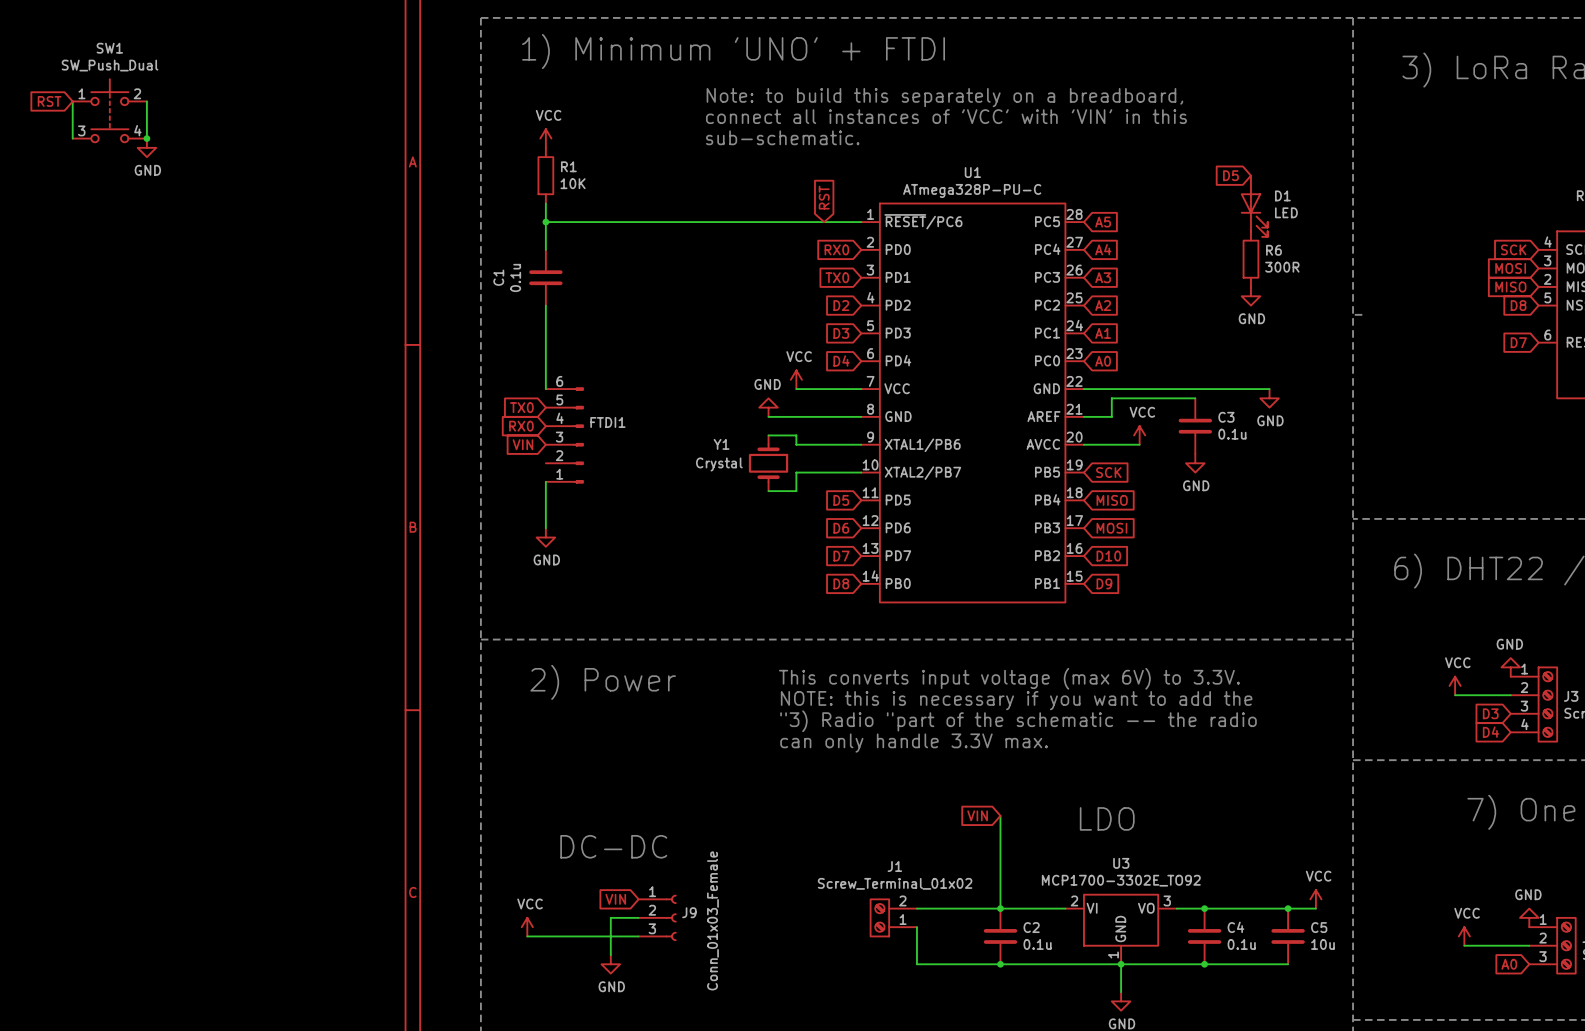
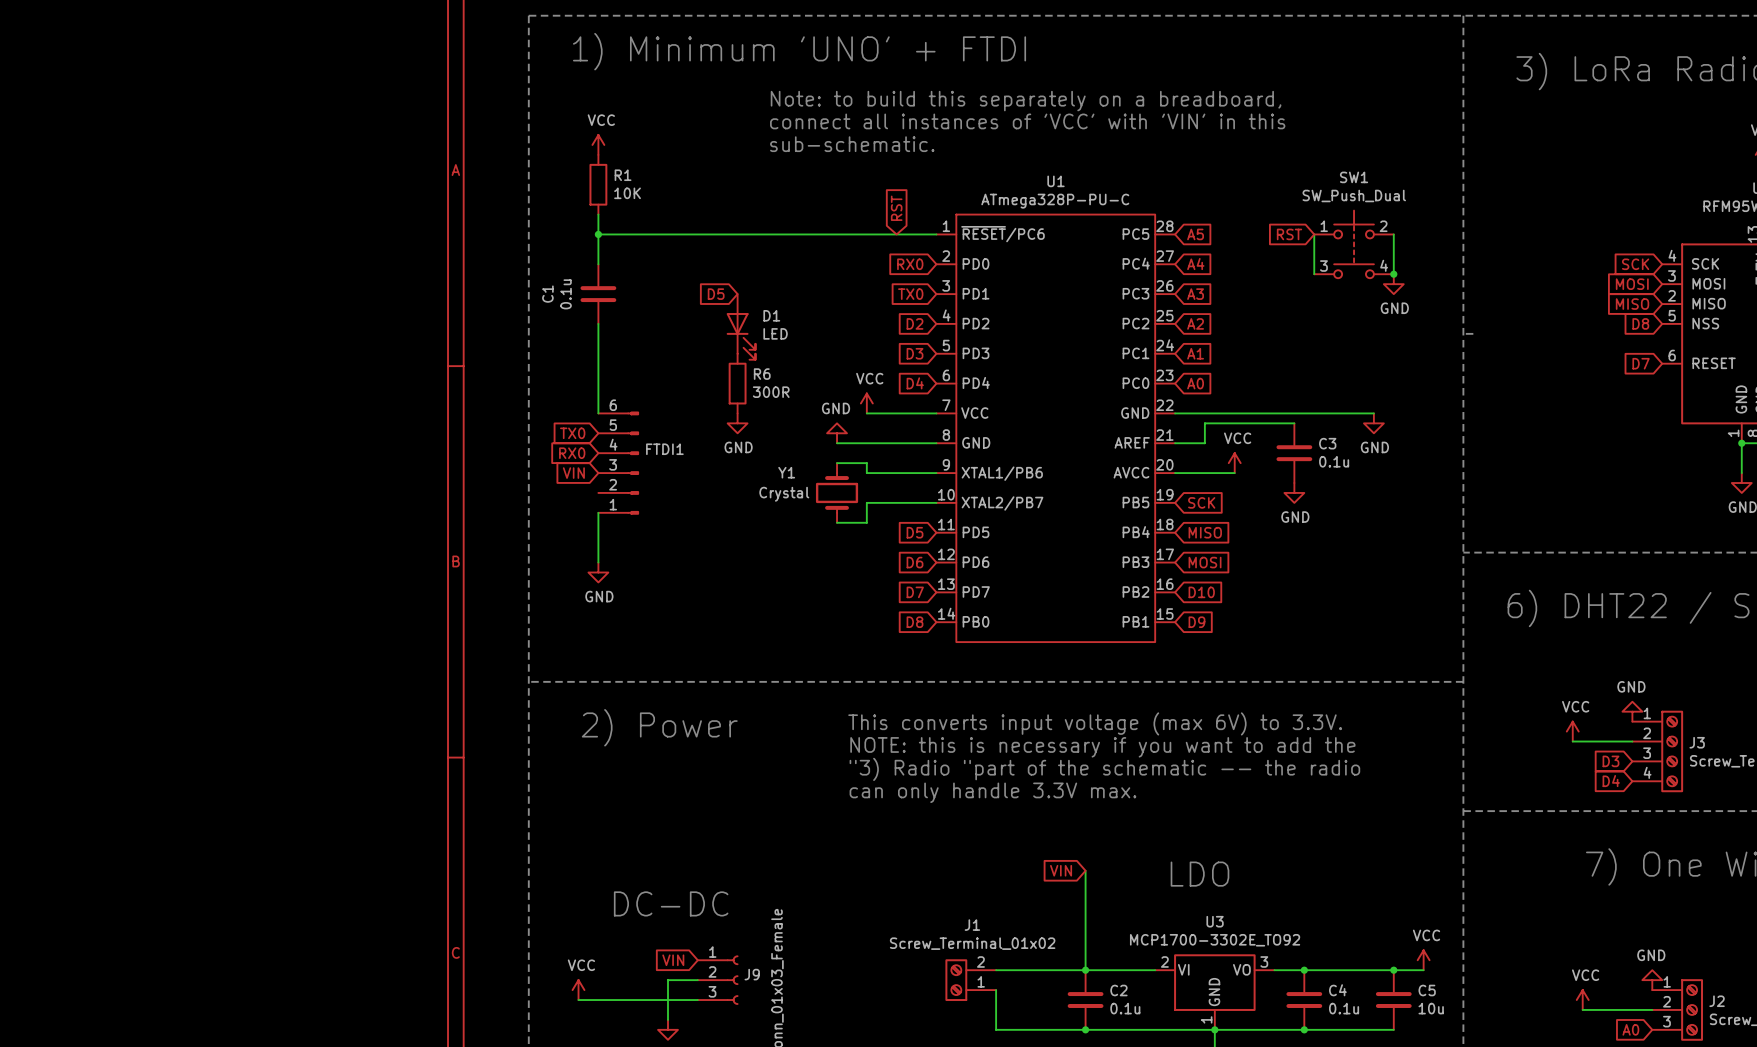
global label: RST (49, 101) -> none
wire: (72, 101) (72, 138) -> none
wire: (146, 101) (146, 138) -> none
SW1 position: (109, 110) -> (1354, 244)
junction: (146, 138) -> none
power symbol: GND (146, 147) -> none
global label: D5 (1230, 175) -> none
D1 position: (1254, 206) -> (741, 326)
global label: none -> RST (1289, 234)
wire: none -> (1314, 234) (1314, 274)
wire: none -> (1393, 234) (1393, 274)
R6 position: (1250, 259) -> (737, 383)
junction: none -> (1393, 274)
global label: none -> D5 (716, 294)
power symbol position: GND (1250, 296) -> GND (1393, 284)
power symbol: none -> GND (737, 423)

